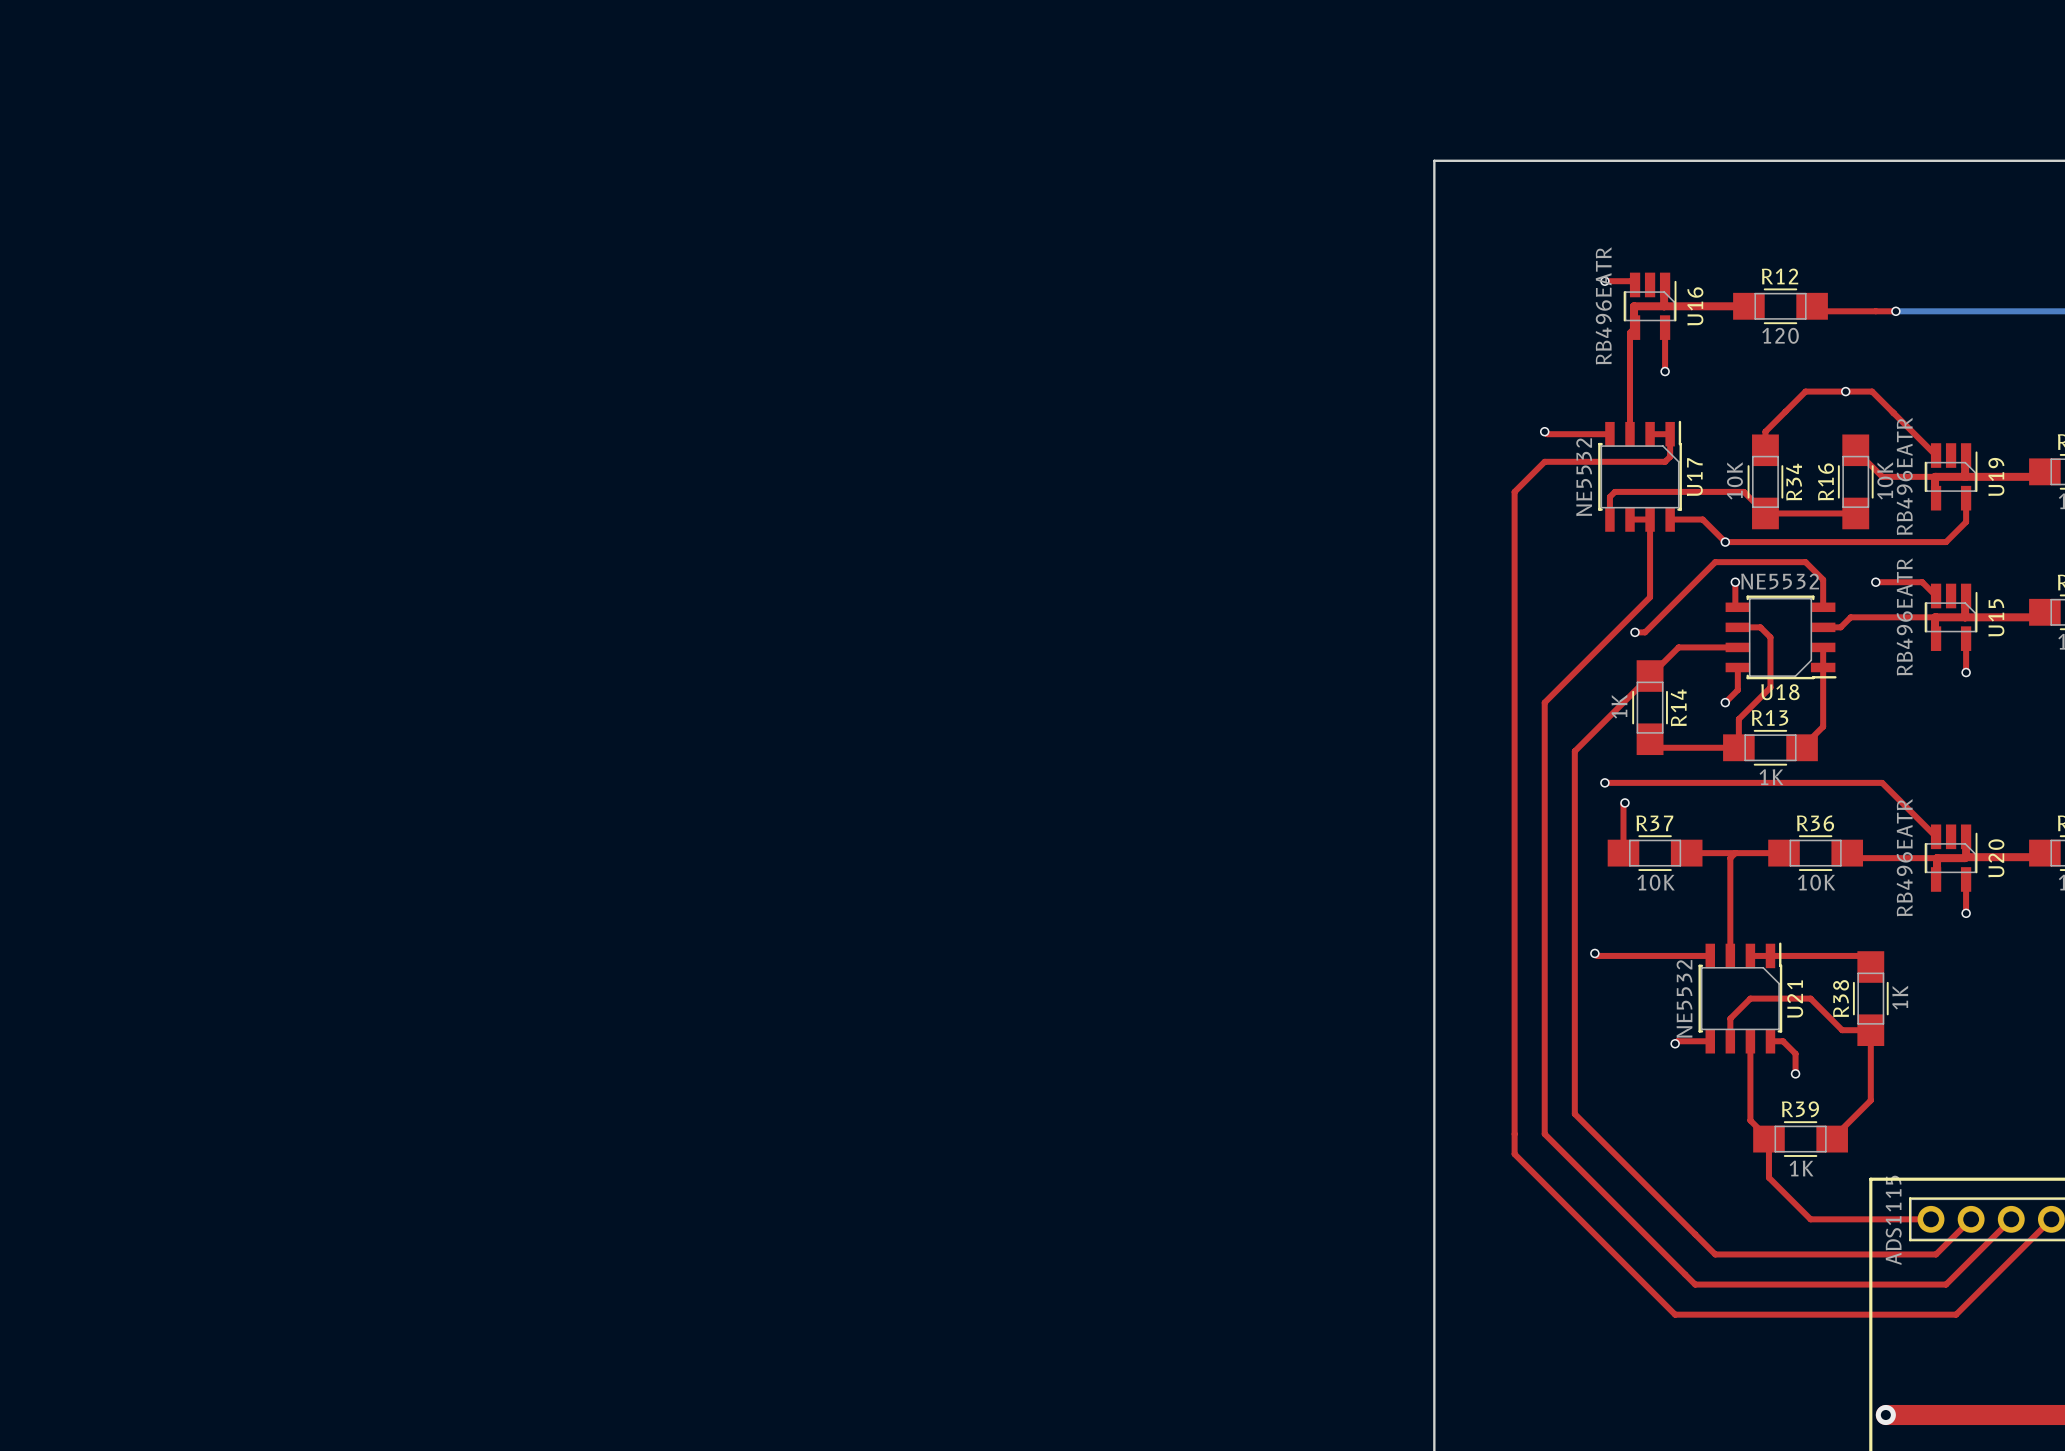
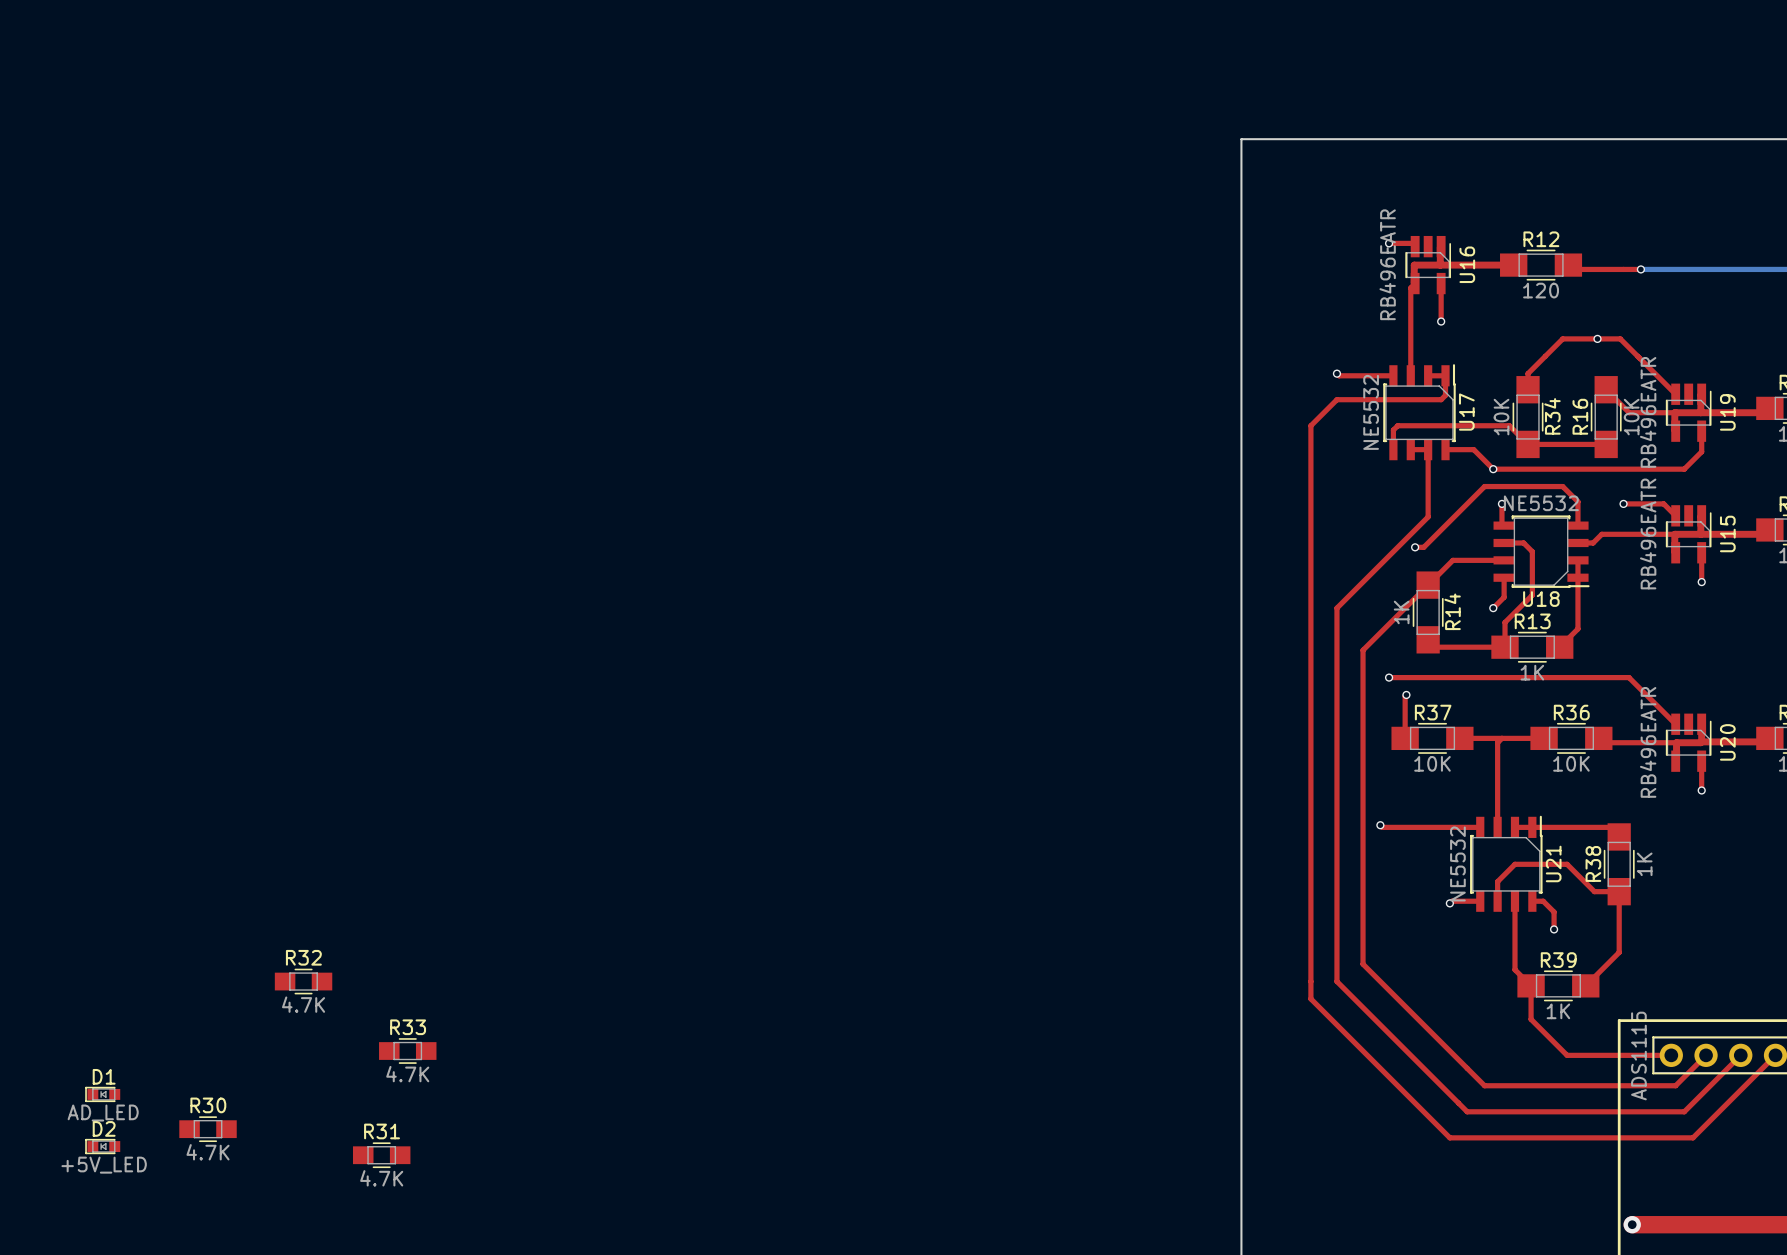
R32: none -> 4.7K (303, 981)
R33: none -> 4.7K (407, 1051)
D1: none -> AD_LED (102, 1094)
R30: none -> 4.7K (208, 1129)
D2: none -> +5V_LED (102, 1146)
R31: none -> 4.7K (381, 1155)

